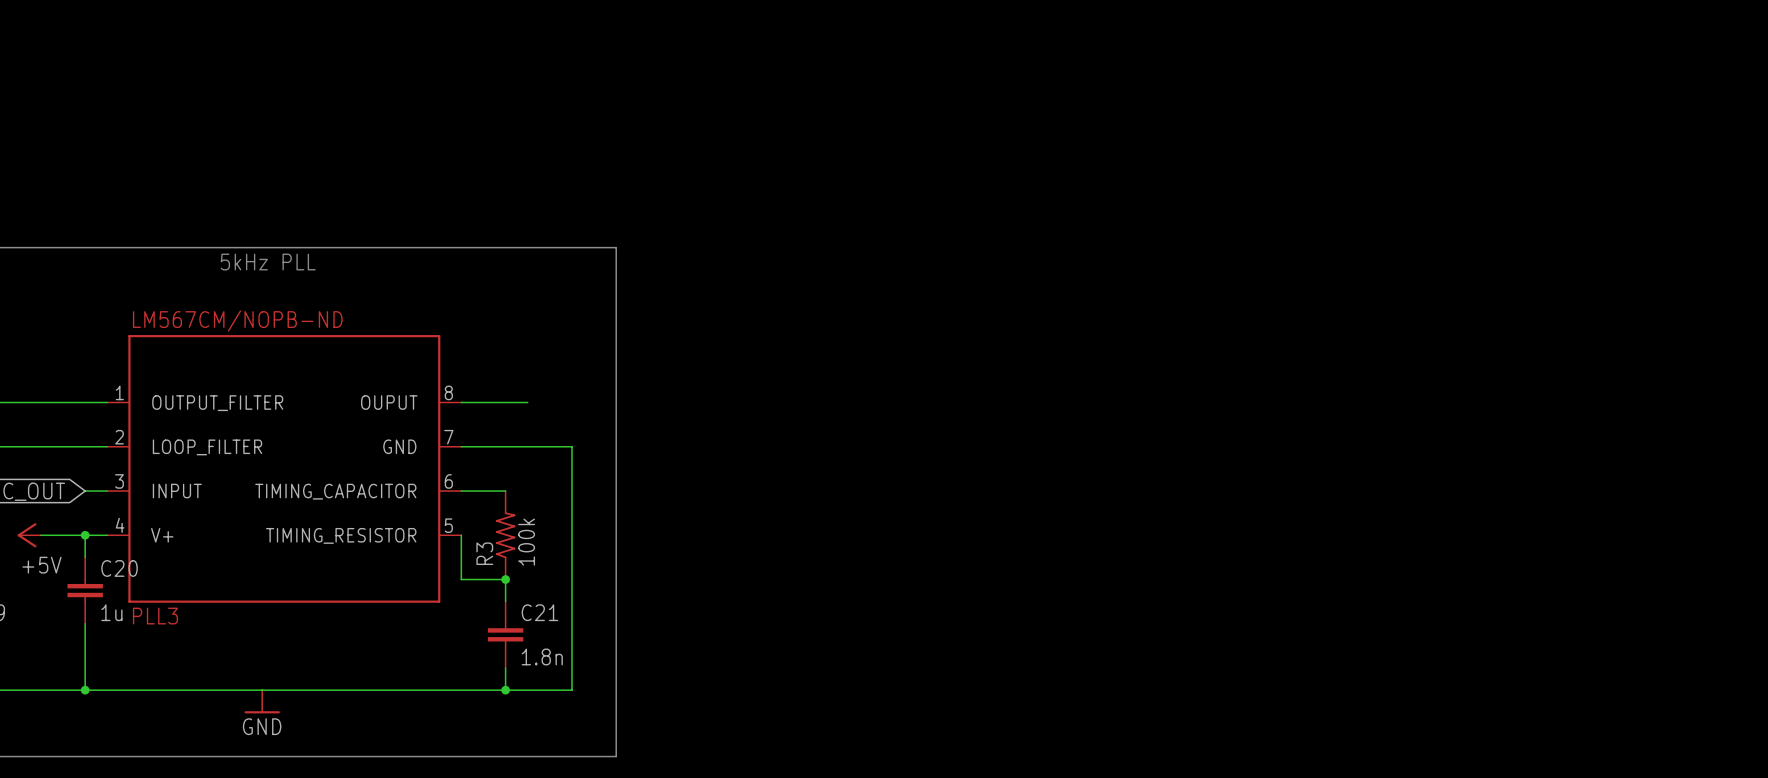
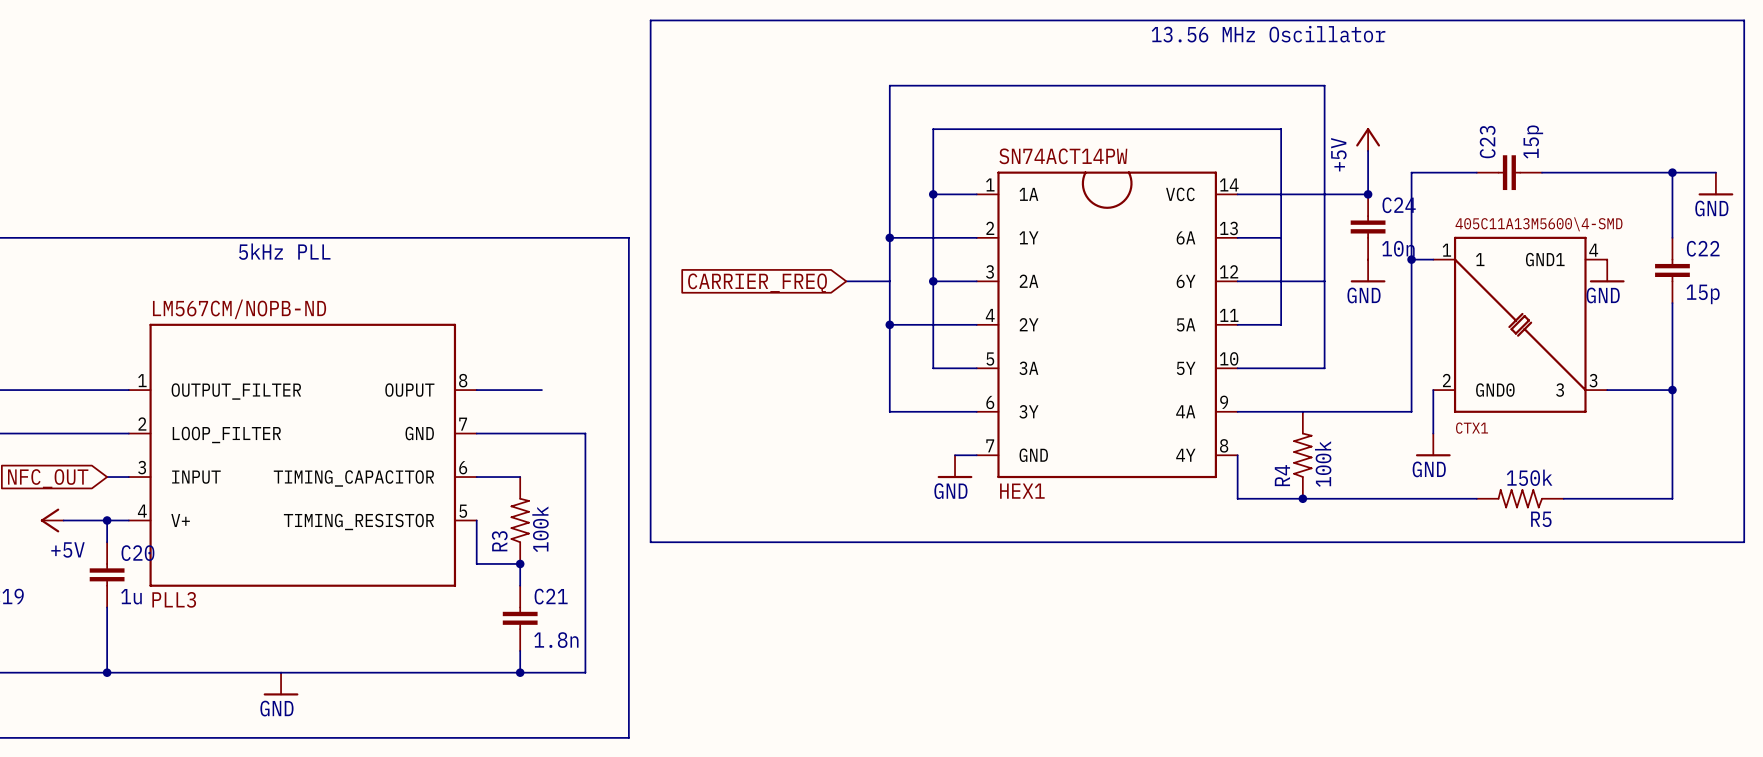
line: none -> (650, 20) (650, 542) (1744, 542) (1744, 20) (650, 20)
text: none -> 13.56 MHz Oscillator (1268, 34)
power symbol: none -> +5V (1368, 139)
wire: none -> (1368, 150) (1368, 194) (1237, 194)
wire: none -> (1476, 172) (1411, 172) (1411, 411) (1237, 411)
C23: none -> 15p (1509, 172)
wire: none -> (1542, 172) (1715, 172)
wire: none -> (1672, 172) (1672, 237)
junction: none -> (1672, 172)
power symbol: none -> GND (1715, 184)
wire: none -> (933, 194) (976, 194)
junction: none -> (933, 194)
junction: none -> (1368, 194)
C24: none -> 10n (1368, 226)
wire: none -> (889, 237) (976, 237)
junction: none -> (889, 237)
wire: none -> (1237, 237) (1281, 237)
wire: none -> (1411, 259) (1433, 259)
junction: none -> (1411, 259)
C22: none -> 15p (1672, 270)
power symbol: none -> GND (1368, 271)
power symbol: none -> GND (1607, 271)
wire: none -> (846, 281) (889, 281)
wire: none -> (933, 281) (976, 281)
junction: none -> (933, 281)
wire: none -> (1237, 281) (1324, 281)
global label: none -> CARRIER_FREQ (757, 283)
wire: none -> (1672, 303) (1672, 498) (1563, 498)
wire: none -> (889, 324) (976, 324)
junction: none -> (889, 324)
HEX1: none -> SN74ACT14PW (1107, 324)
wire: none -> (1237, 324) (1281, 324) (1281, 129) (933, 129) (933, 368) (976, 368)
CTX1: none -> 405C11A13M5600\4-SMD (1520, 324)
wire: none -> (1237, 368) (1324, 368) (1324, 85) (889, 85) (889, 411) (976, 411)
wire: none -> (1433, 390) (1433, 433)
wire: none -> (1607, 390) (1672, 390)
junction: none -> (1672, 390)
power symbol: none -> GND (1433, 444)
wire: none -> (955, 455) (976, 455)
wire: none -> (1237, 455) (1237, 498) (1476, 498)
R4: none -> 100k (1302, 455)
power symbol: none -> GND (955, 466)
junction: none -> (1302, 498)
R5: none -> 150k (1520, 498)

